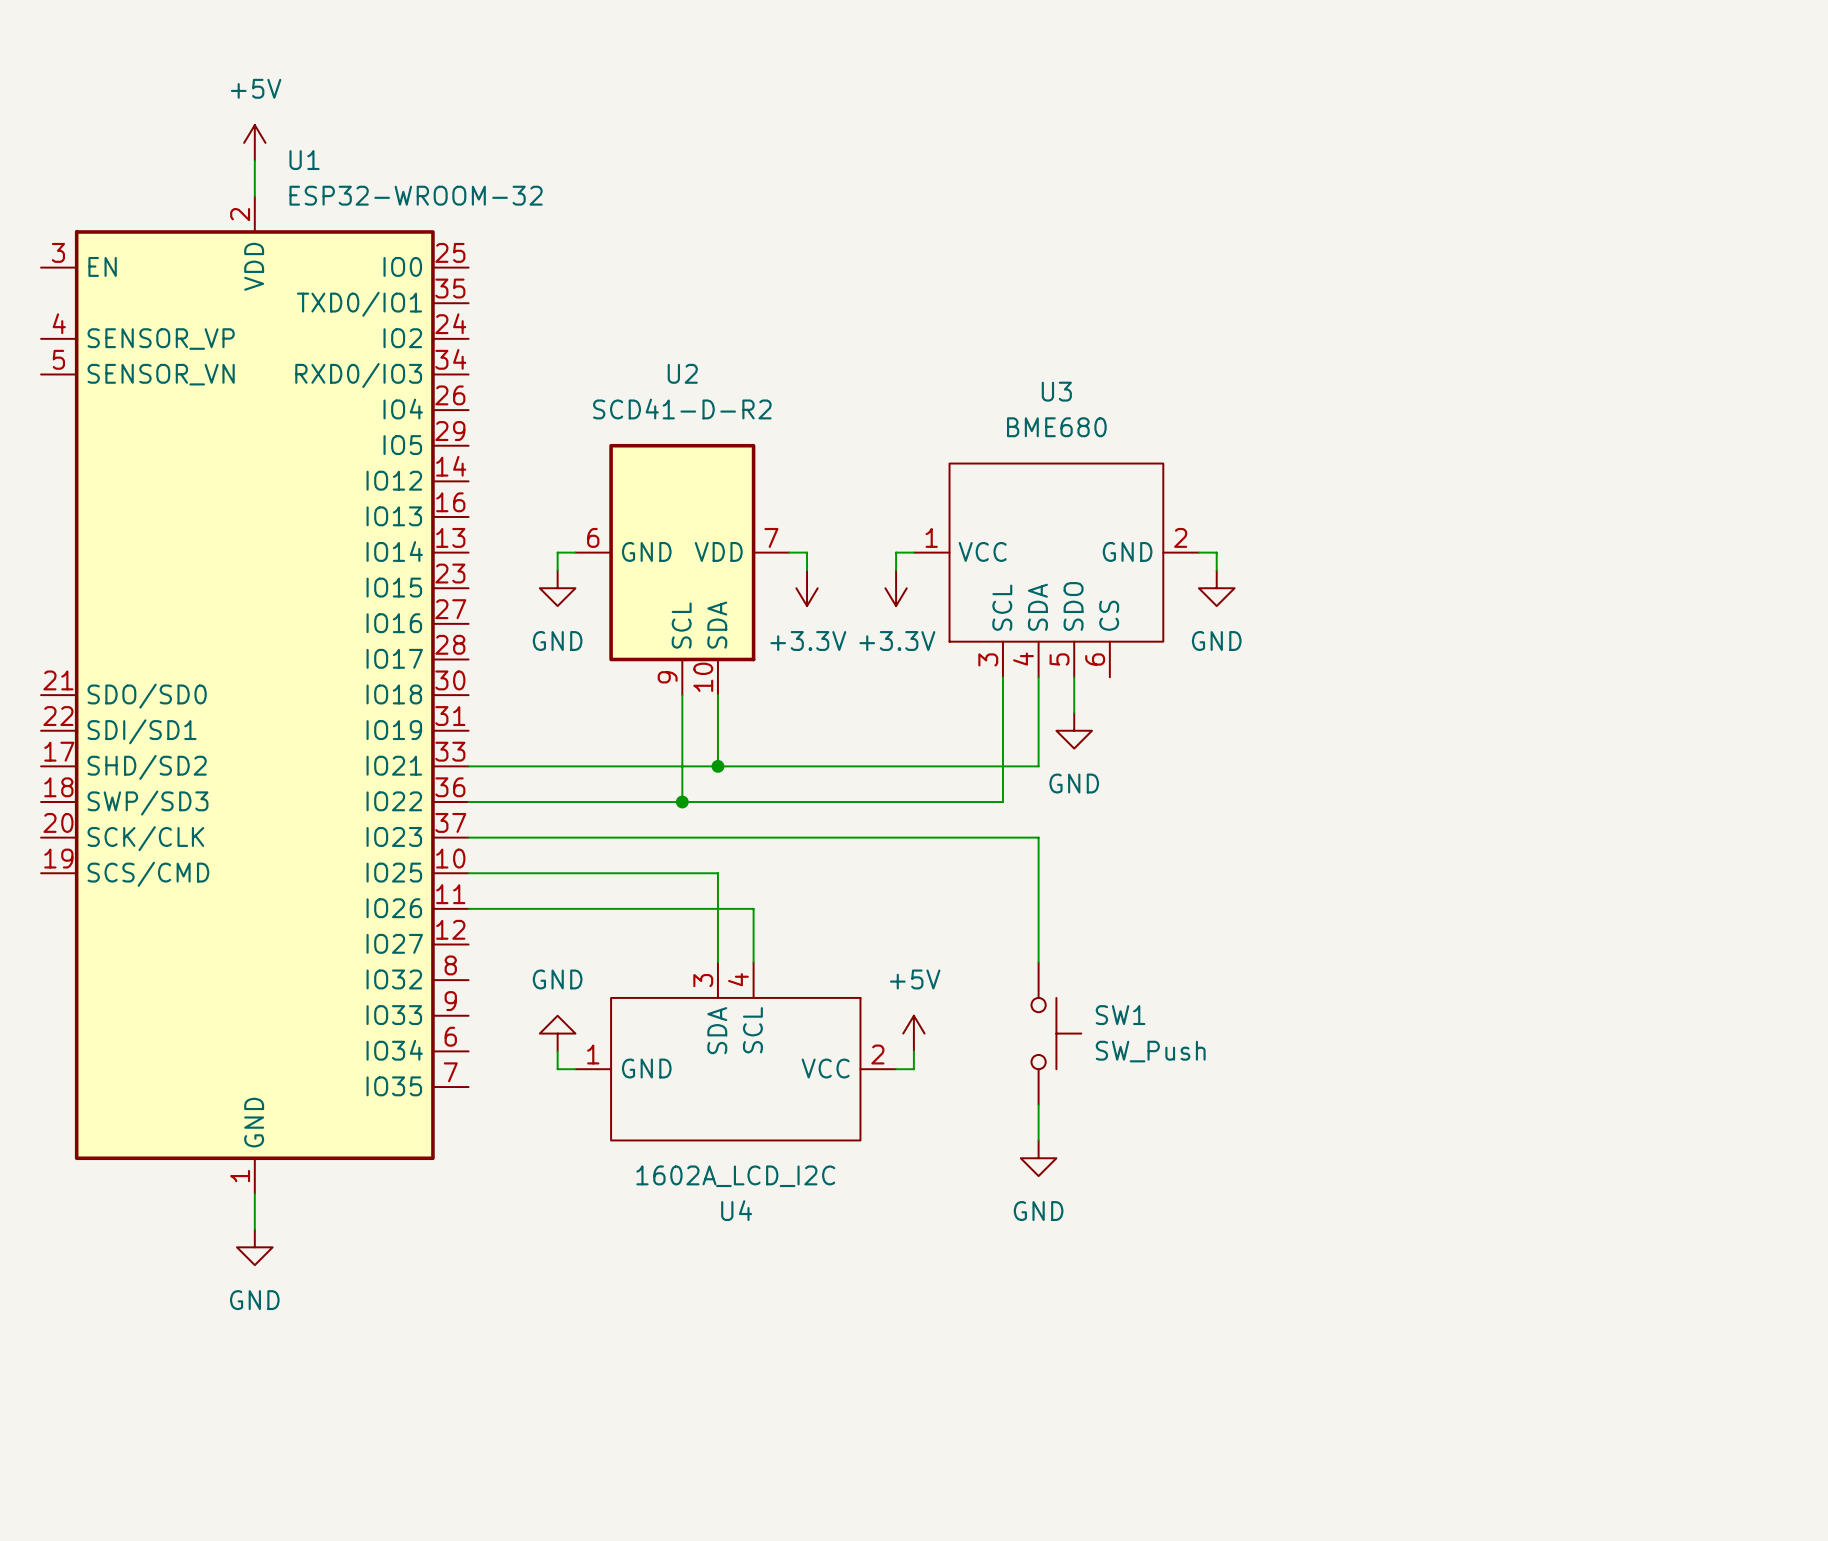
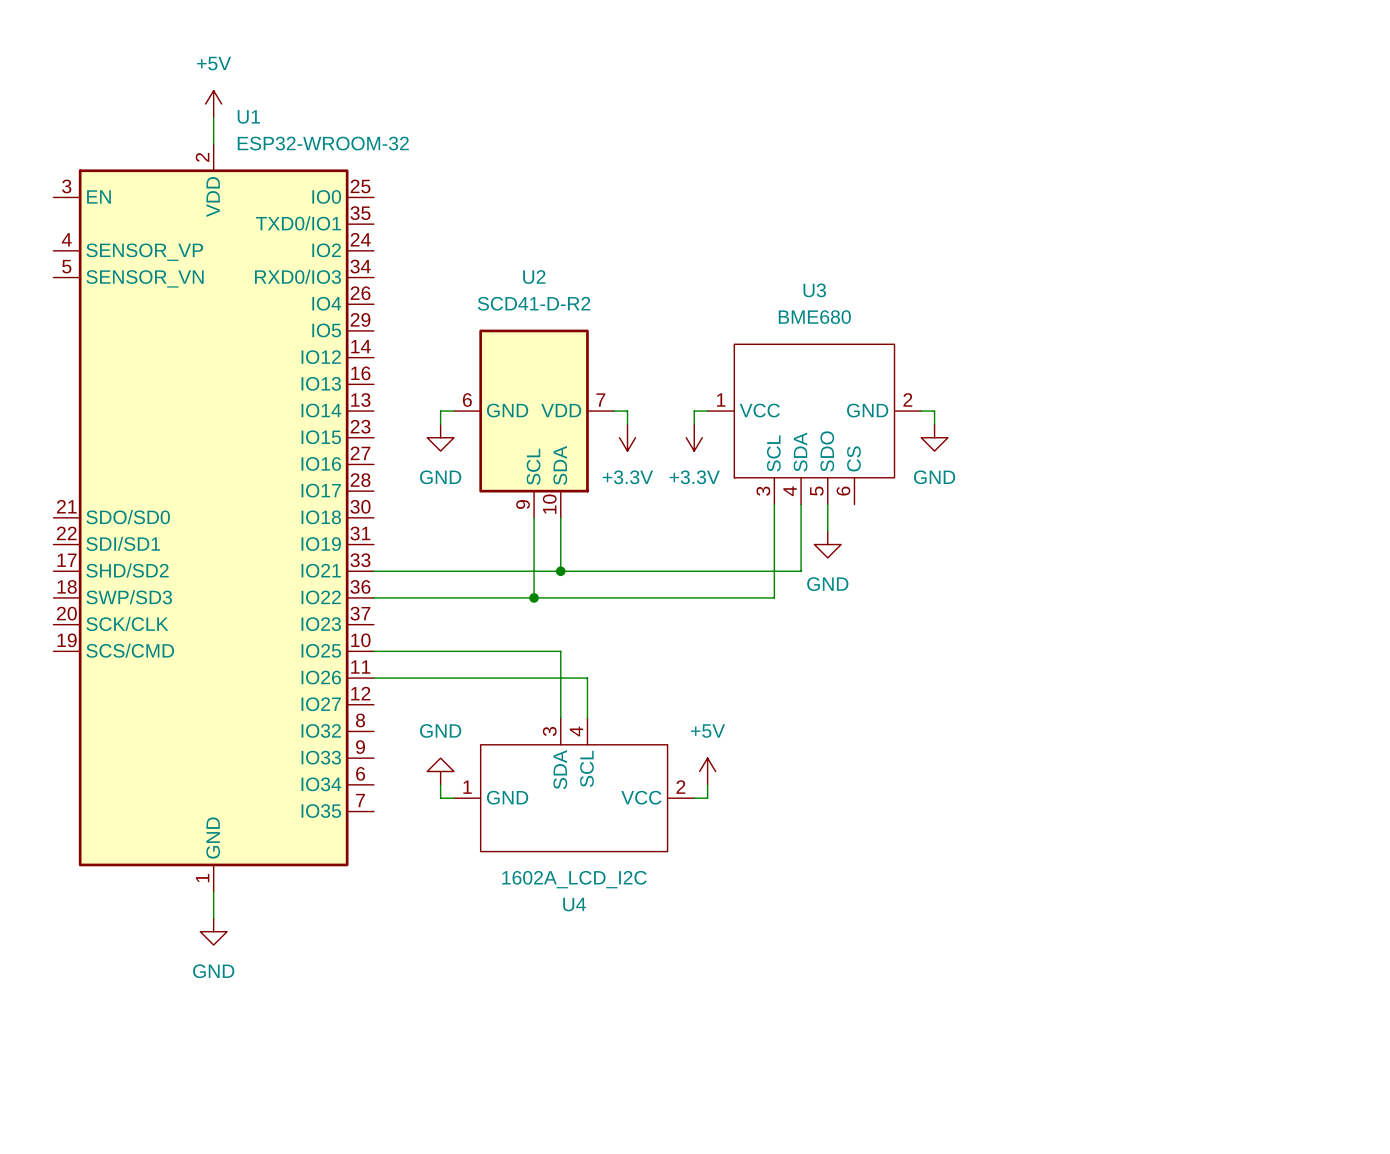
wire: (468, 837) (1038, 837) (1038, 962) -> none
SW1: SW_Push (1056, 1033) -> none
wire: (1038, 1104) (1038, 1140) -> none
power symbol: GND (1038, 1158) -> none

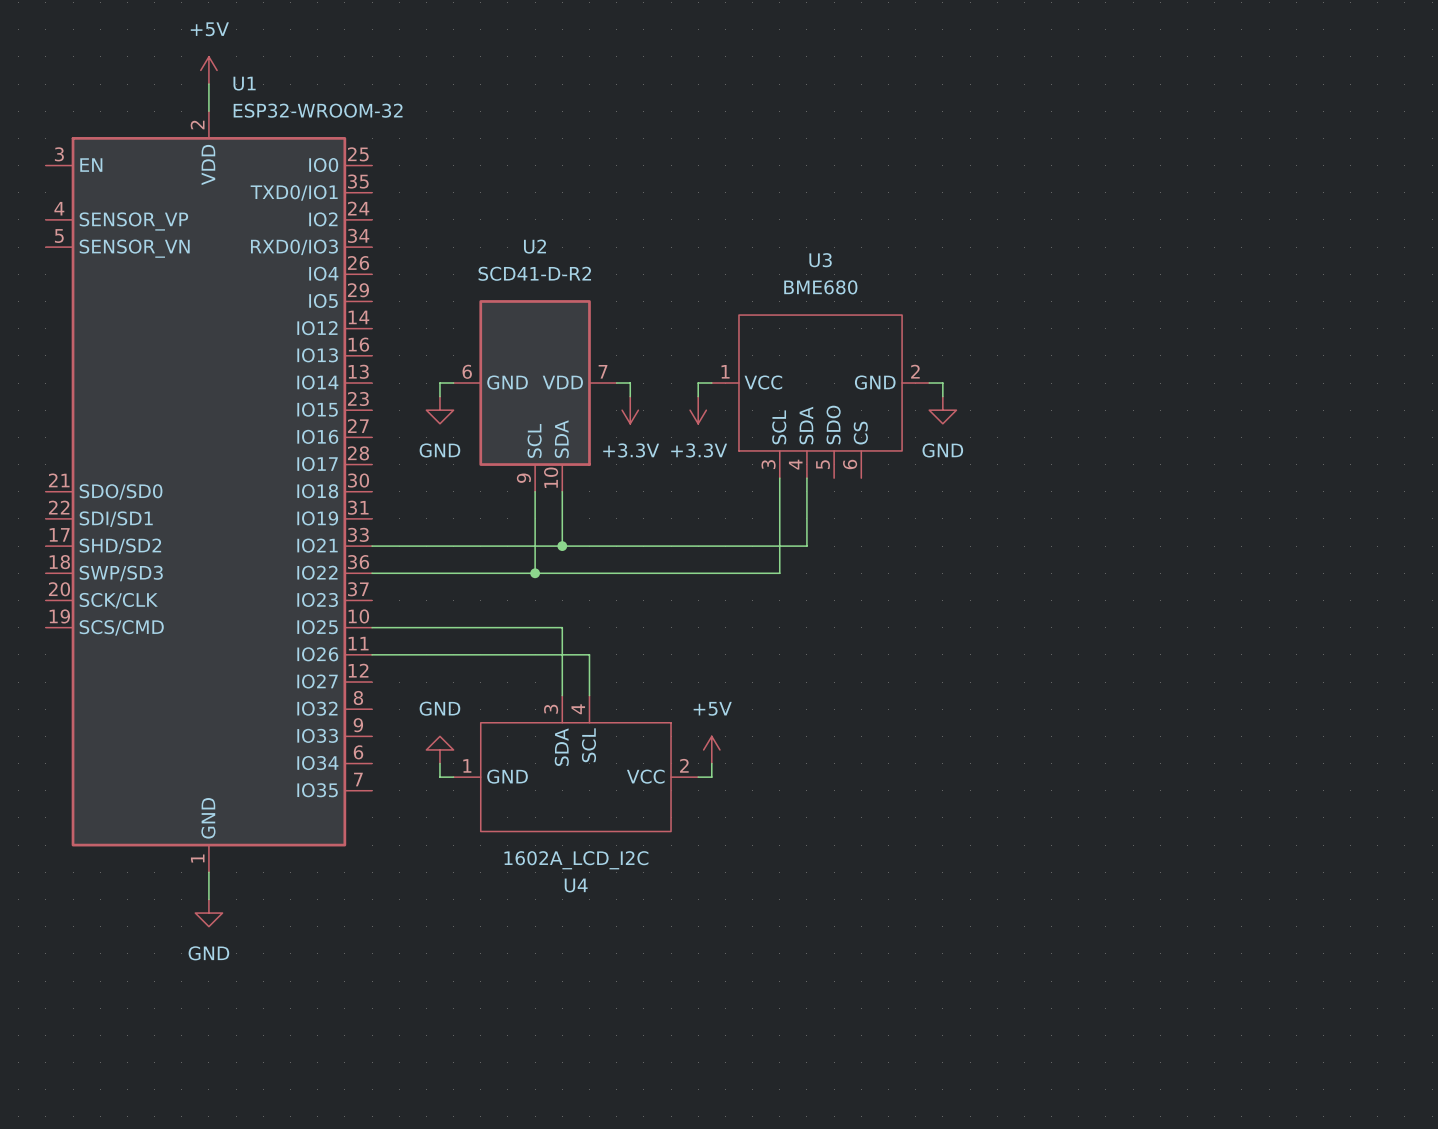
wire: (827, 504) (827, 531) -> none
power symbol: GND (827, 544) -> none

